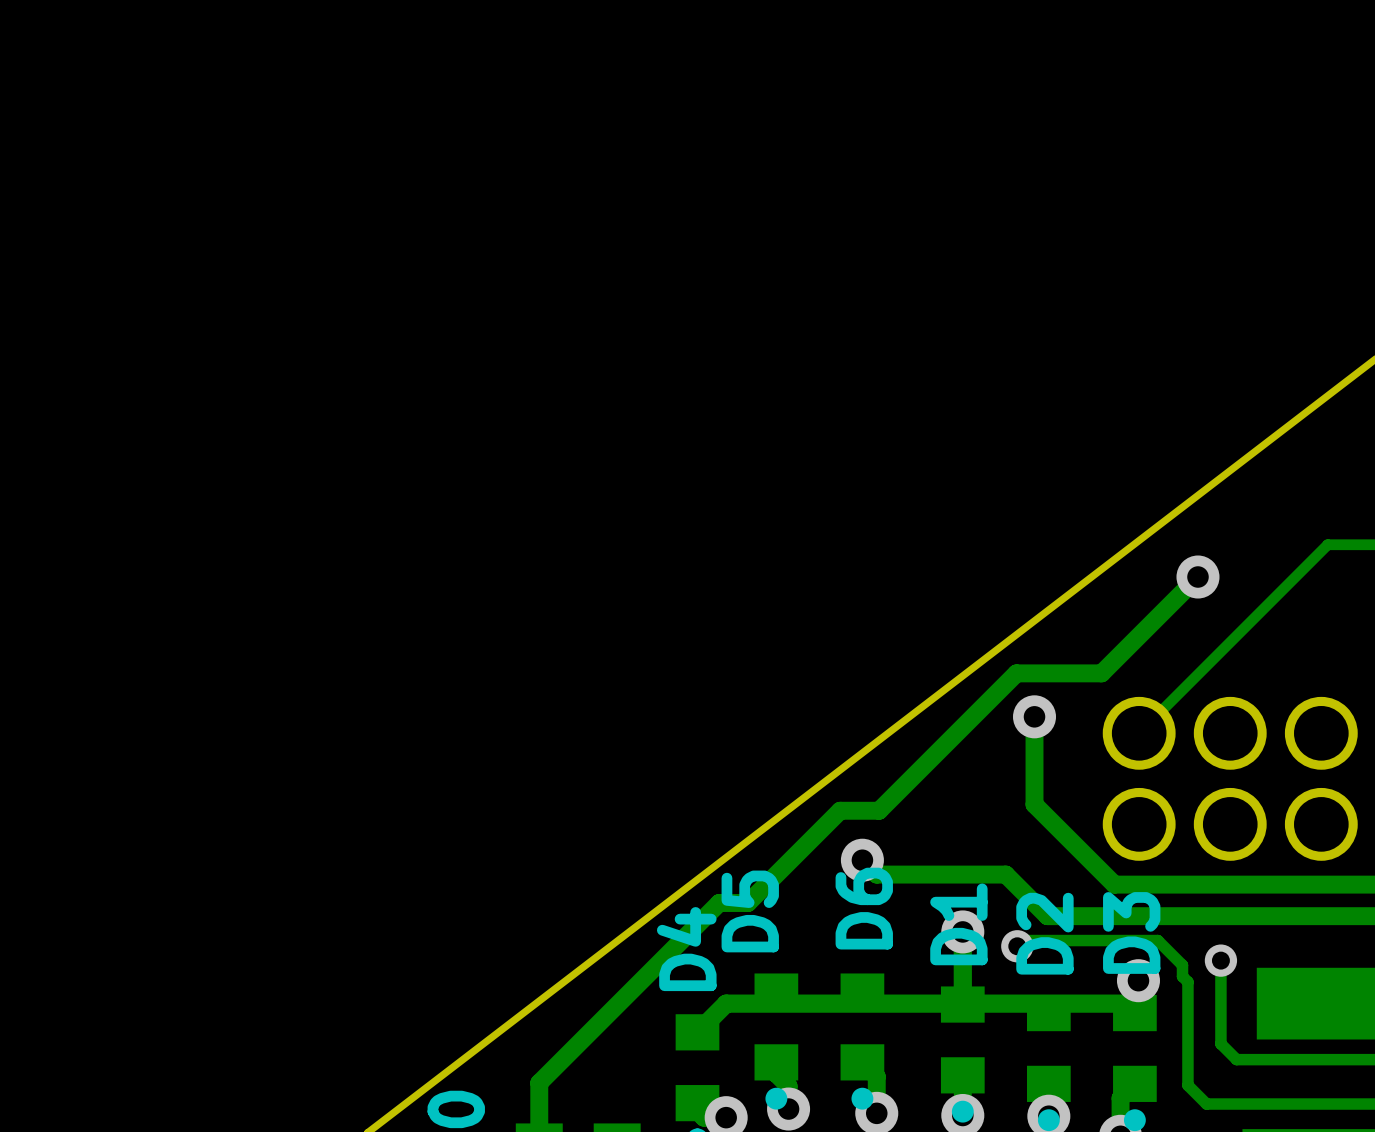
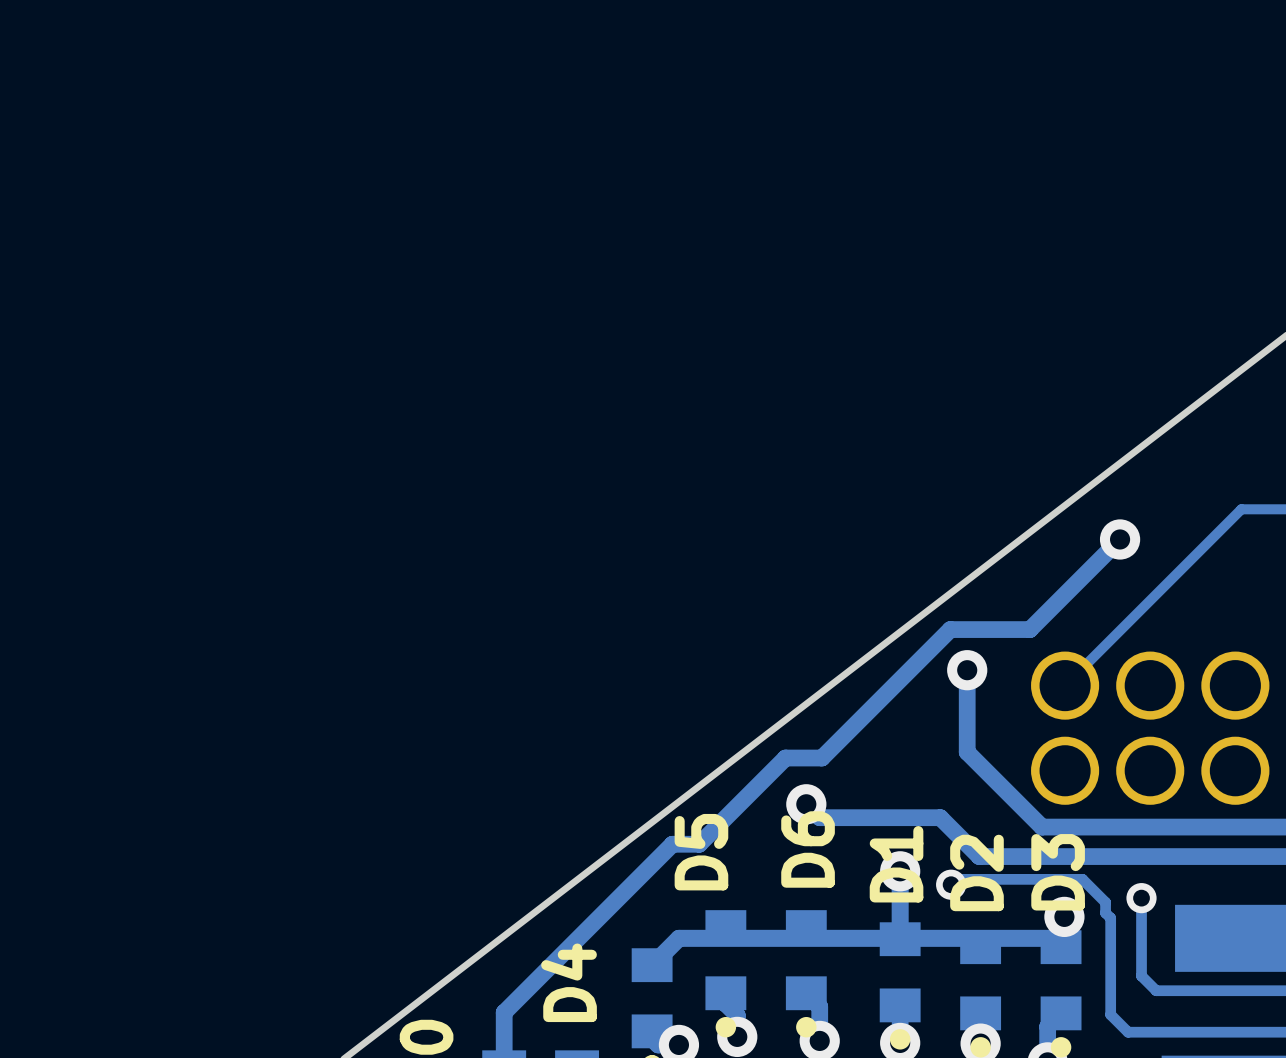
D4 name position: D4 (686, 949) -> D4 (569, 982)

